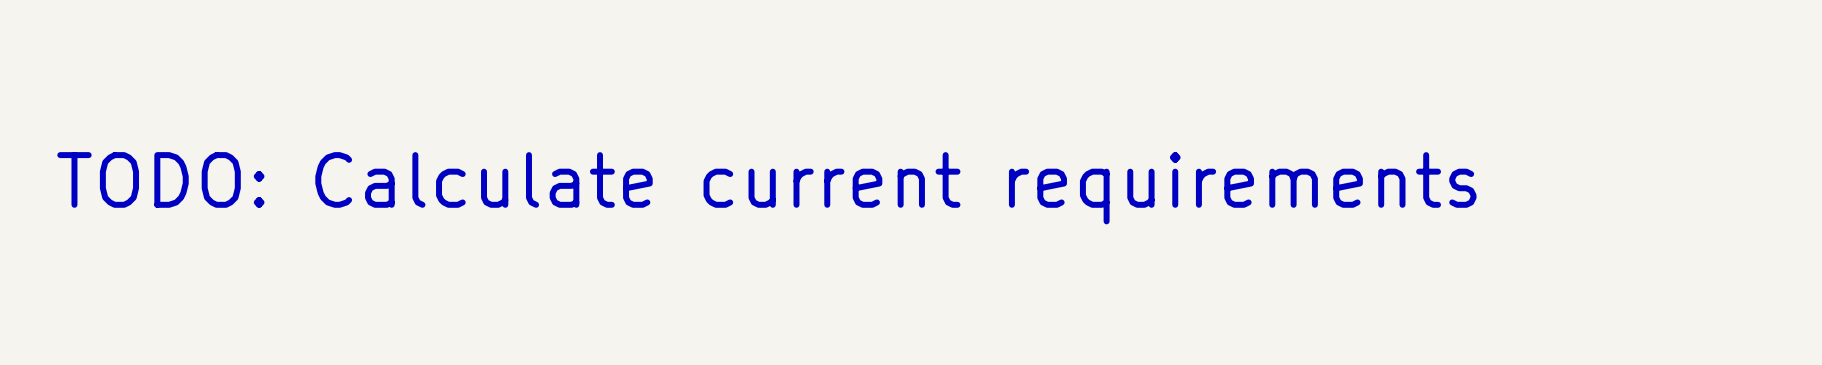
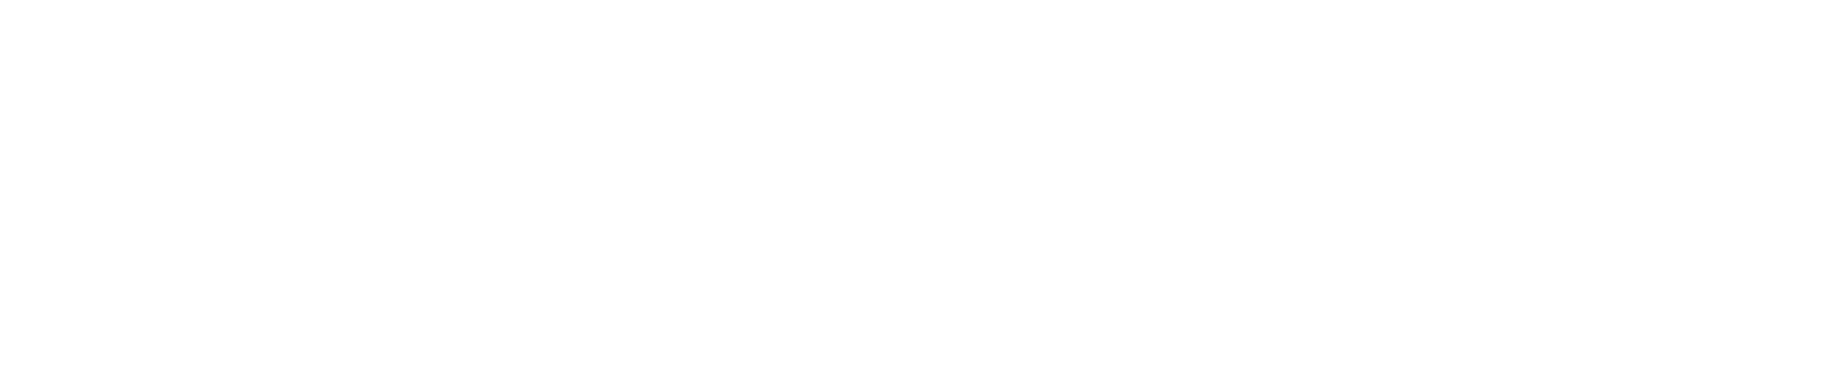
text: TODO: Calculate current requirements (766, 188) -> none

